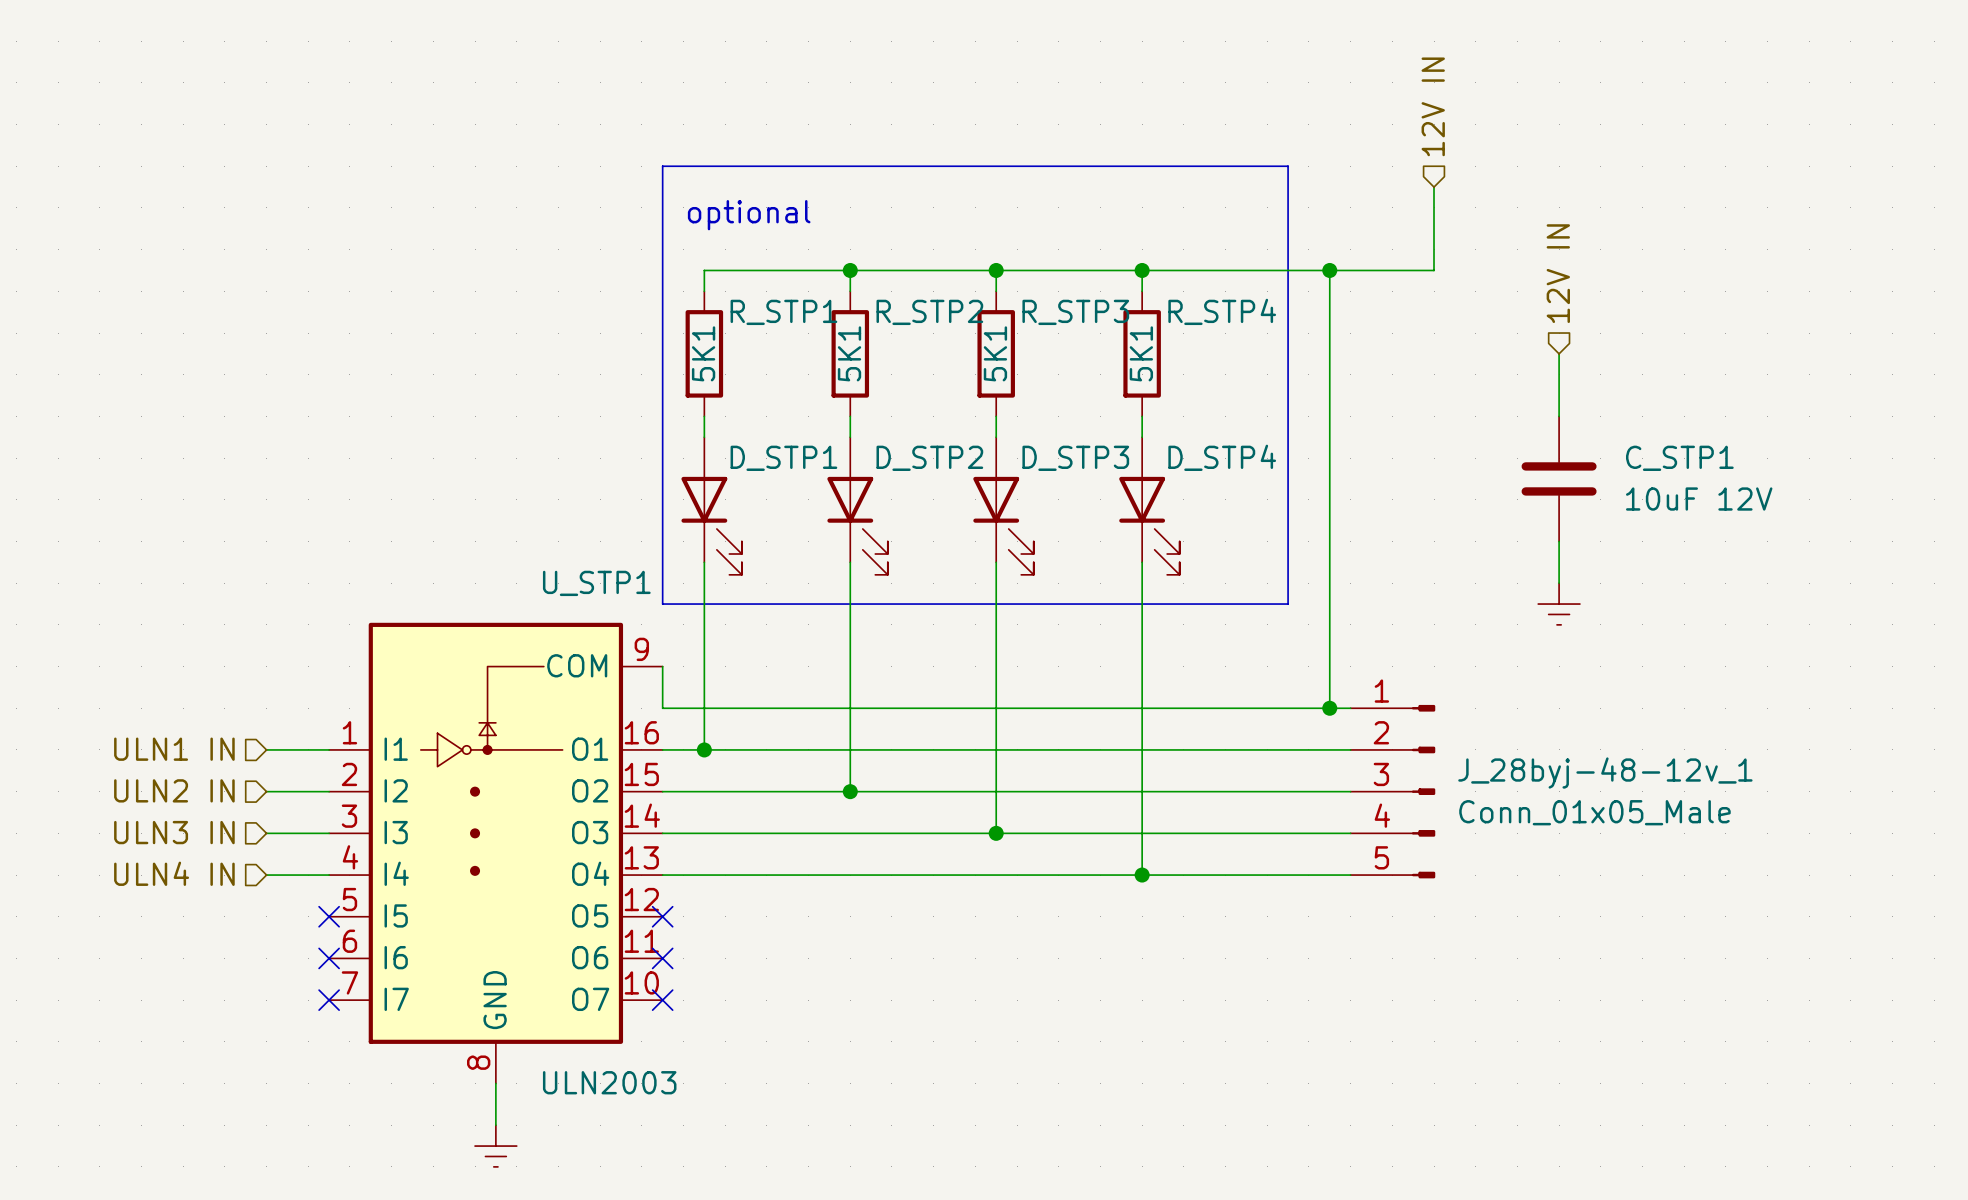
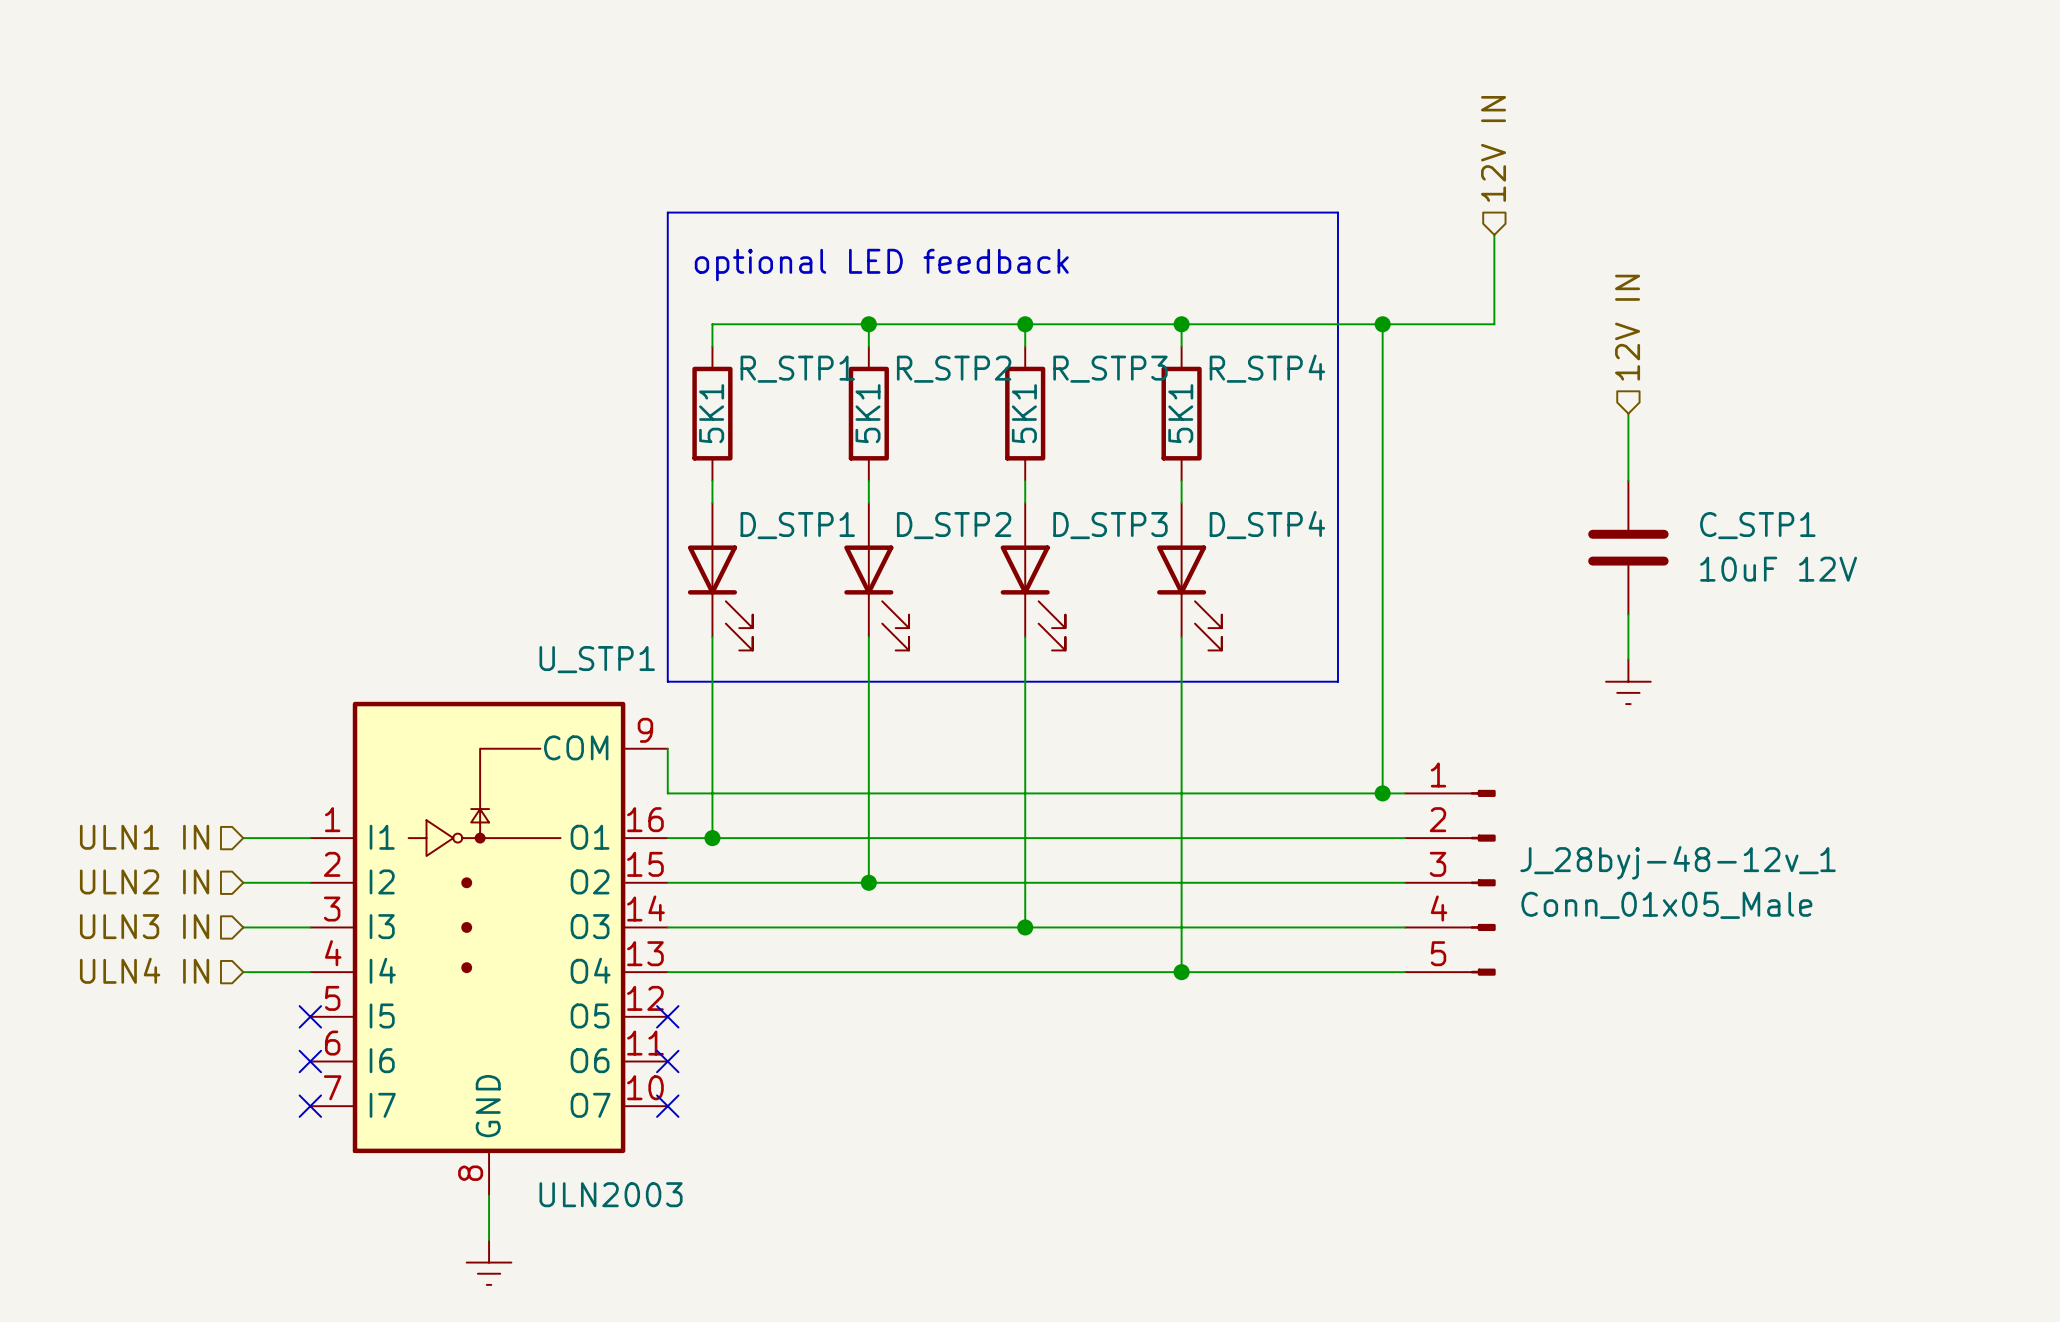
text: optional (749, 215) -> optional LED feedback (881, 265)

